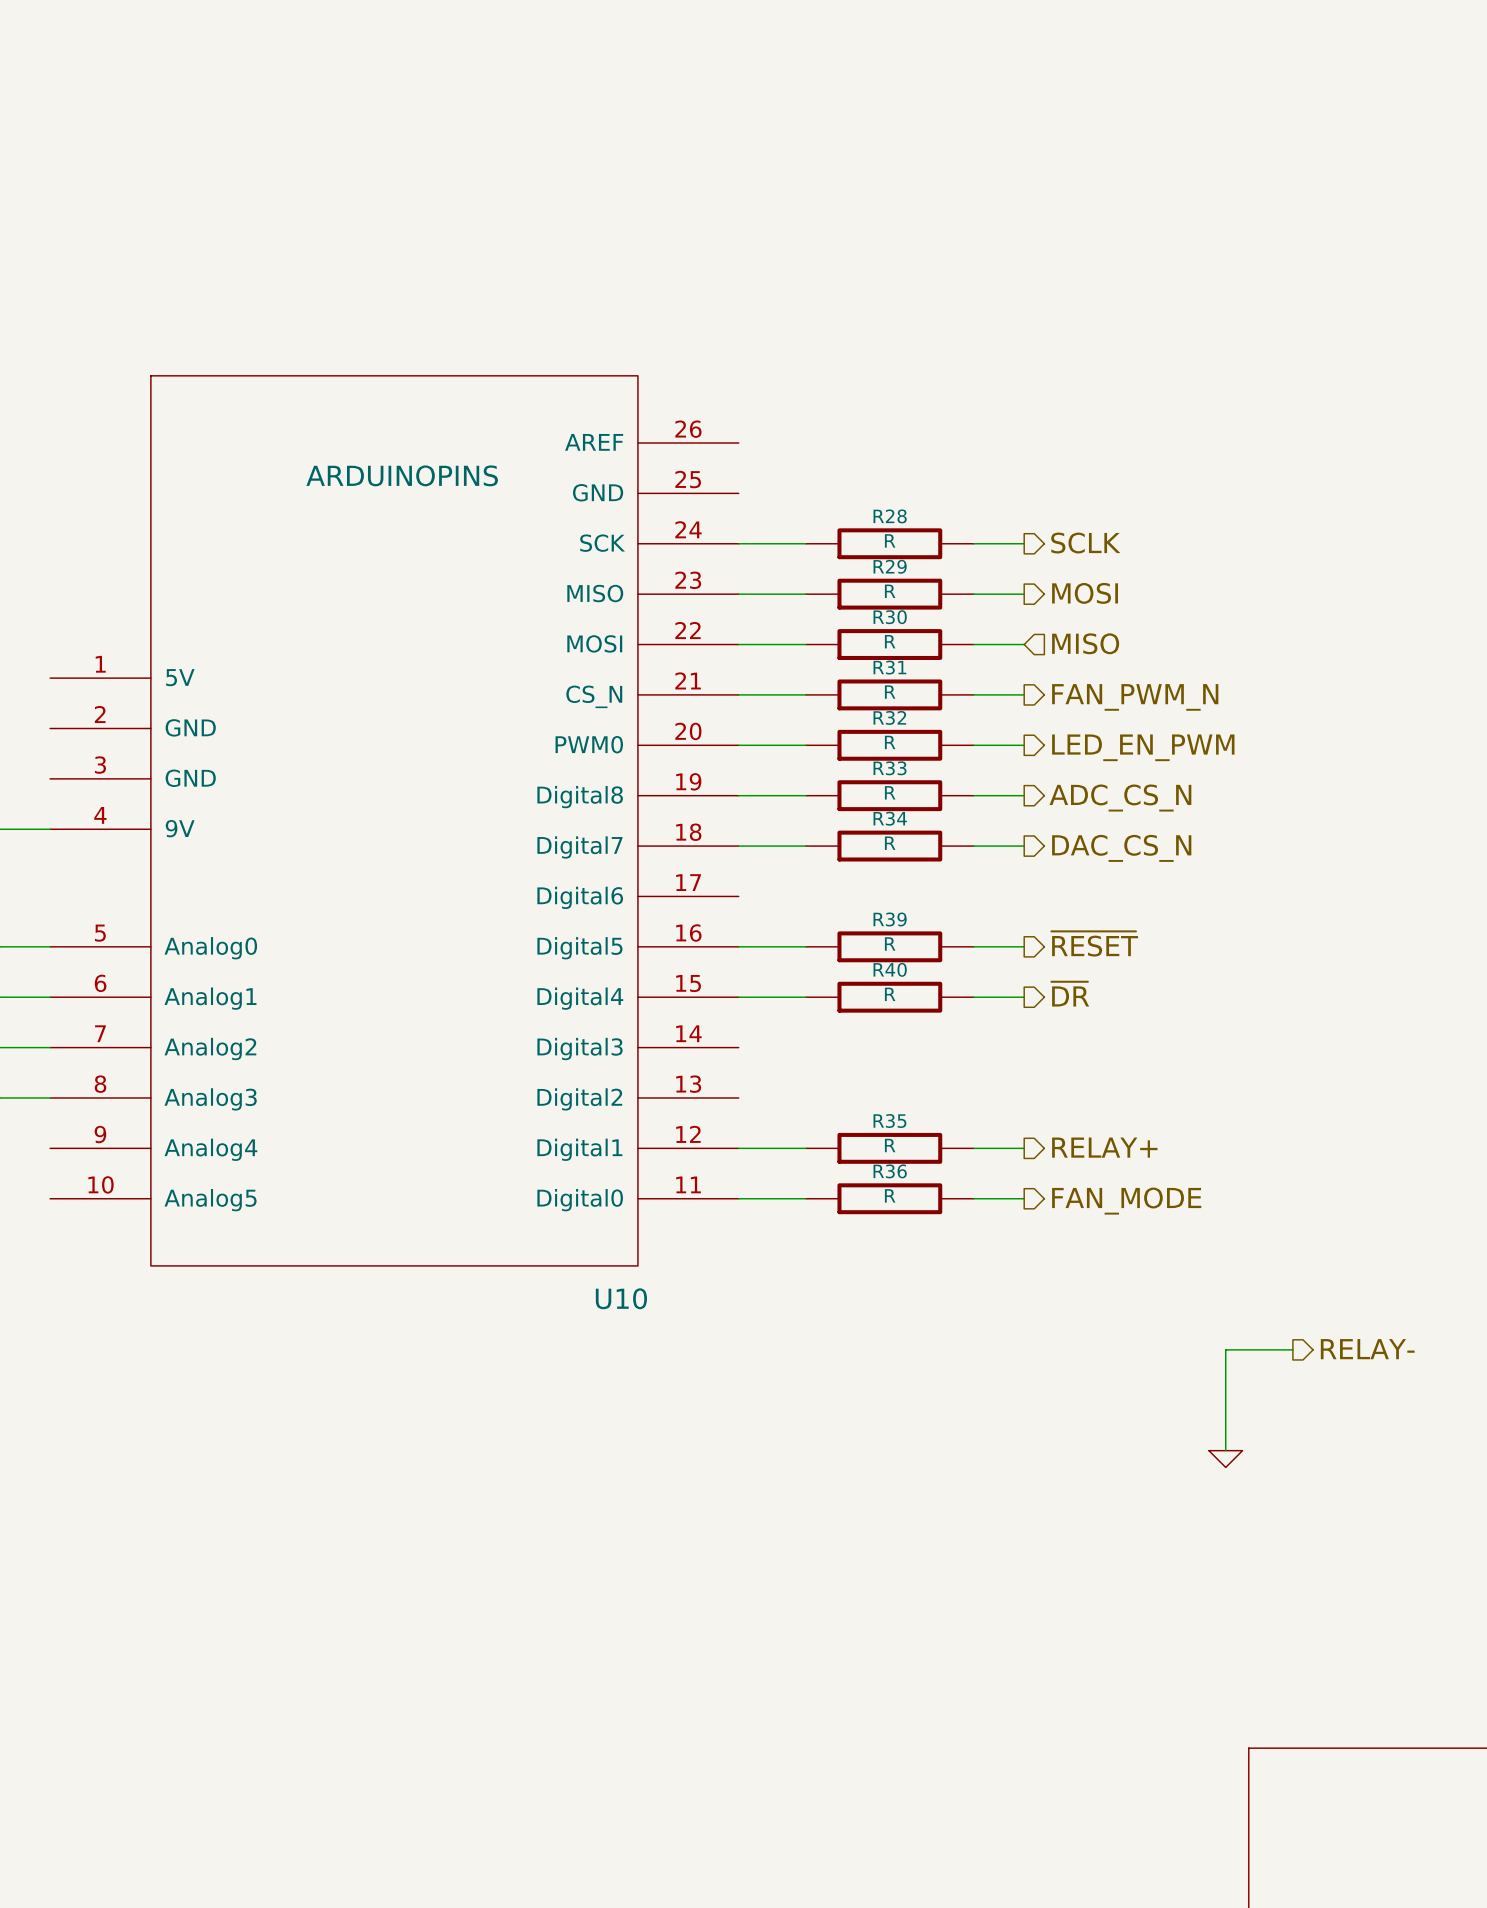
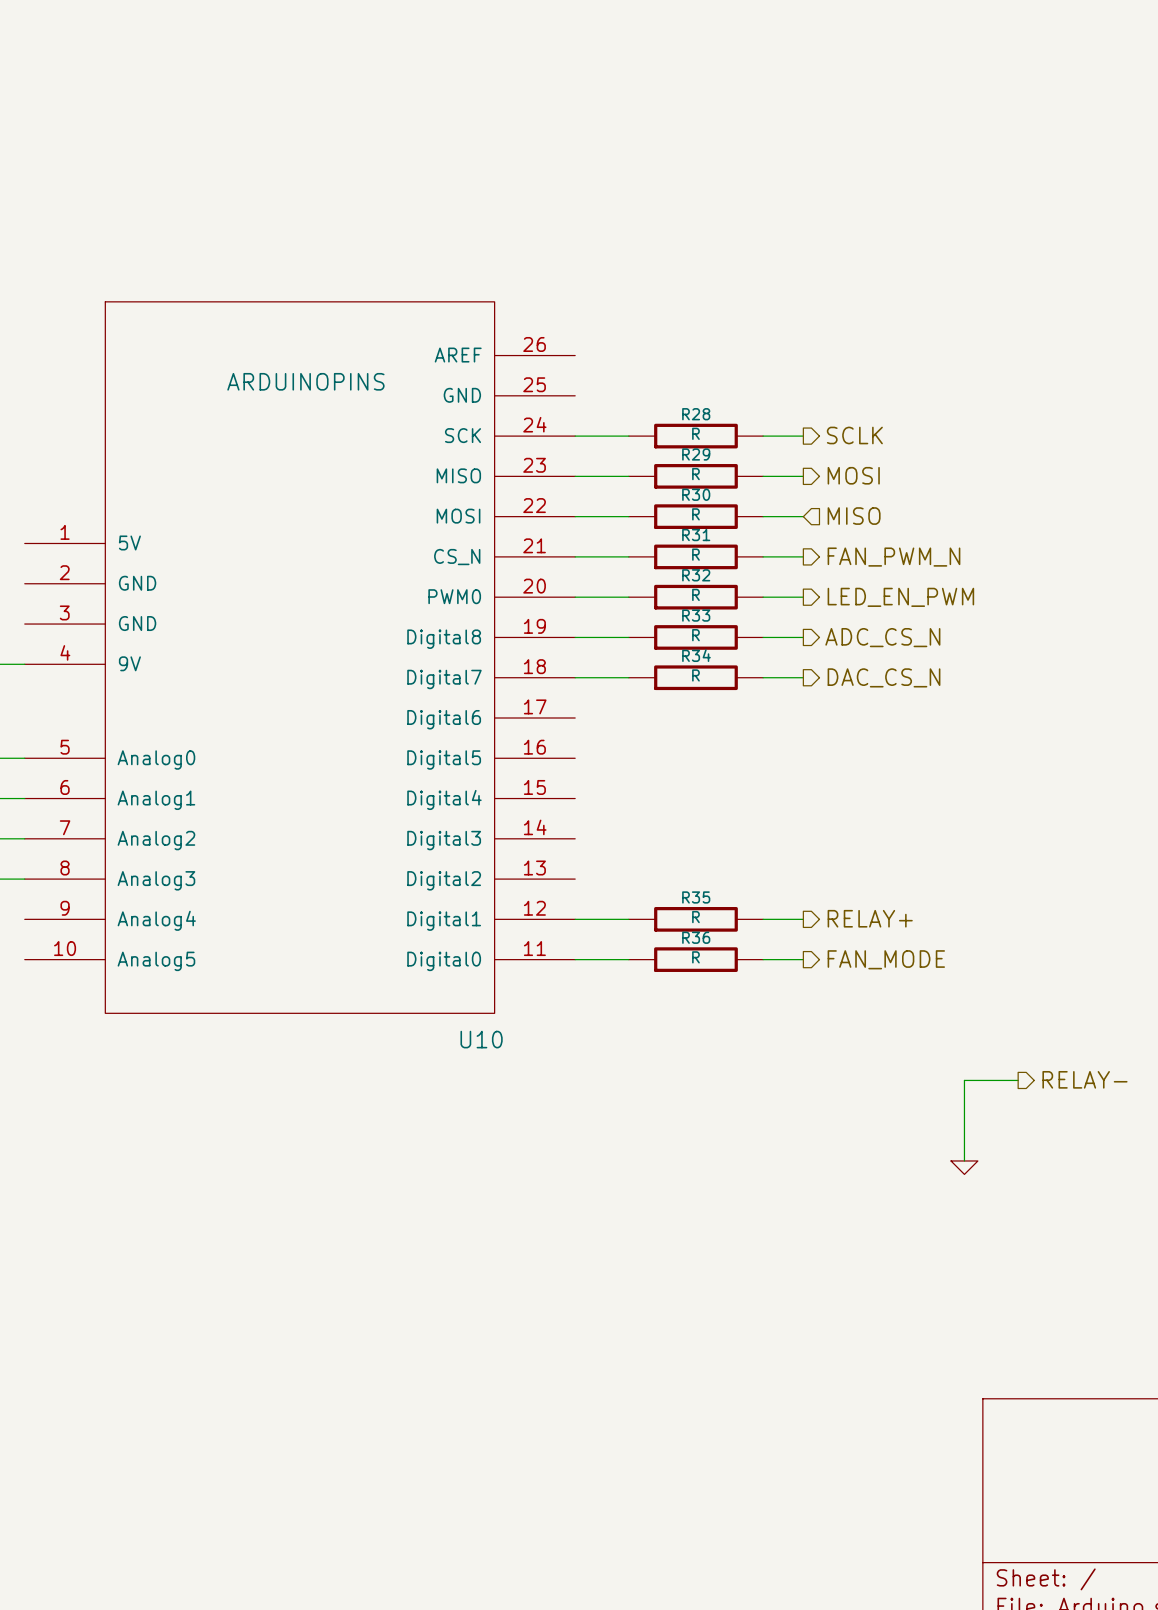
hierarchical label: ~{RESET} (1094, 943) -> none
wire: (738, 946) (805, 946) -> none
R39: R (889, 946) -> none
wire: (973, 946) (1024, 946) -> none
hierarchical label: ~{DR} (1070, 994) -> none
wire: (738, 997) (805, 997) -> none
R40: R (889, 997) -> none
wire: (973, 997) (1024, 997) -> none

